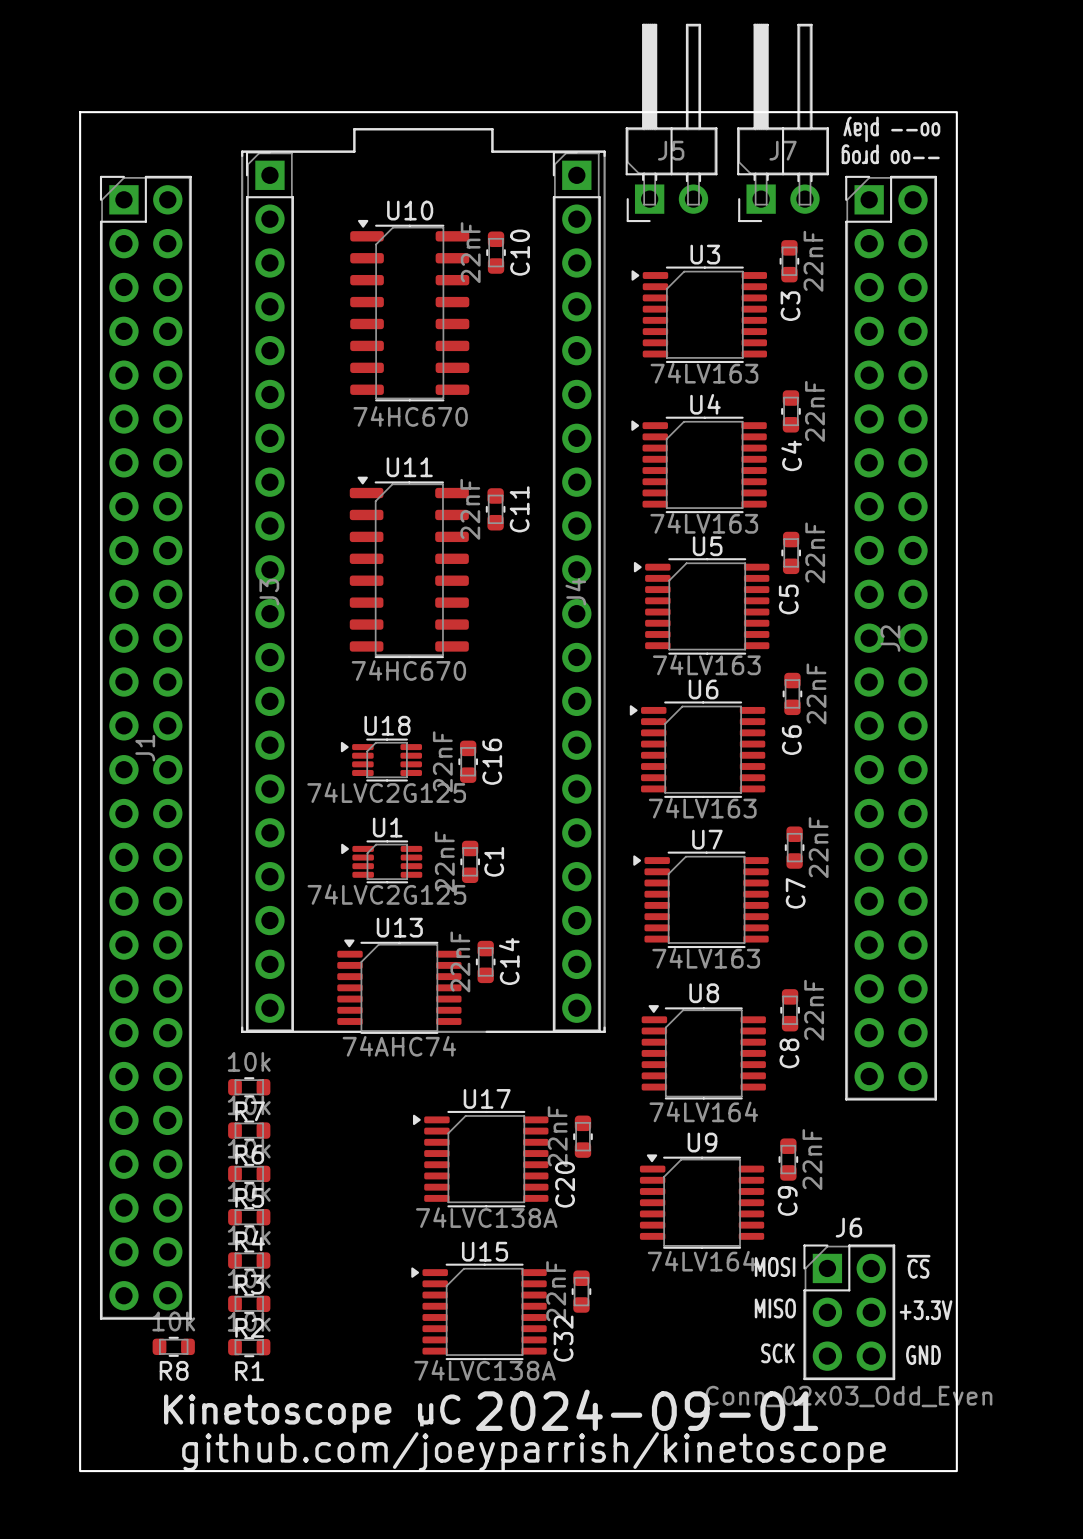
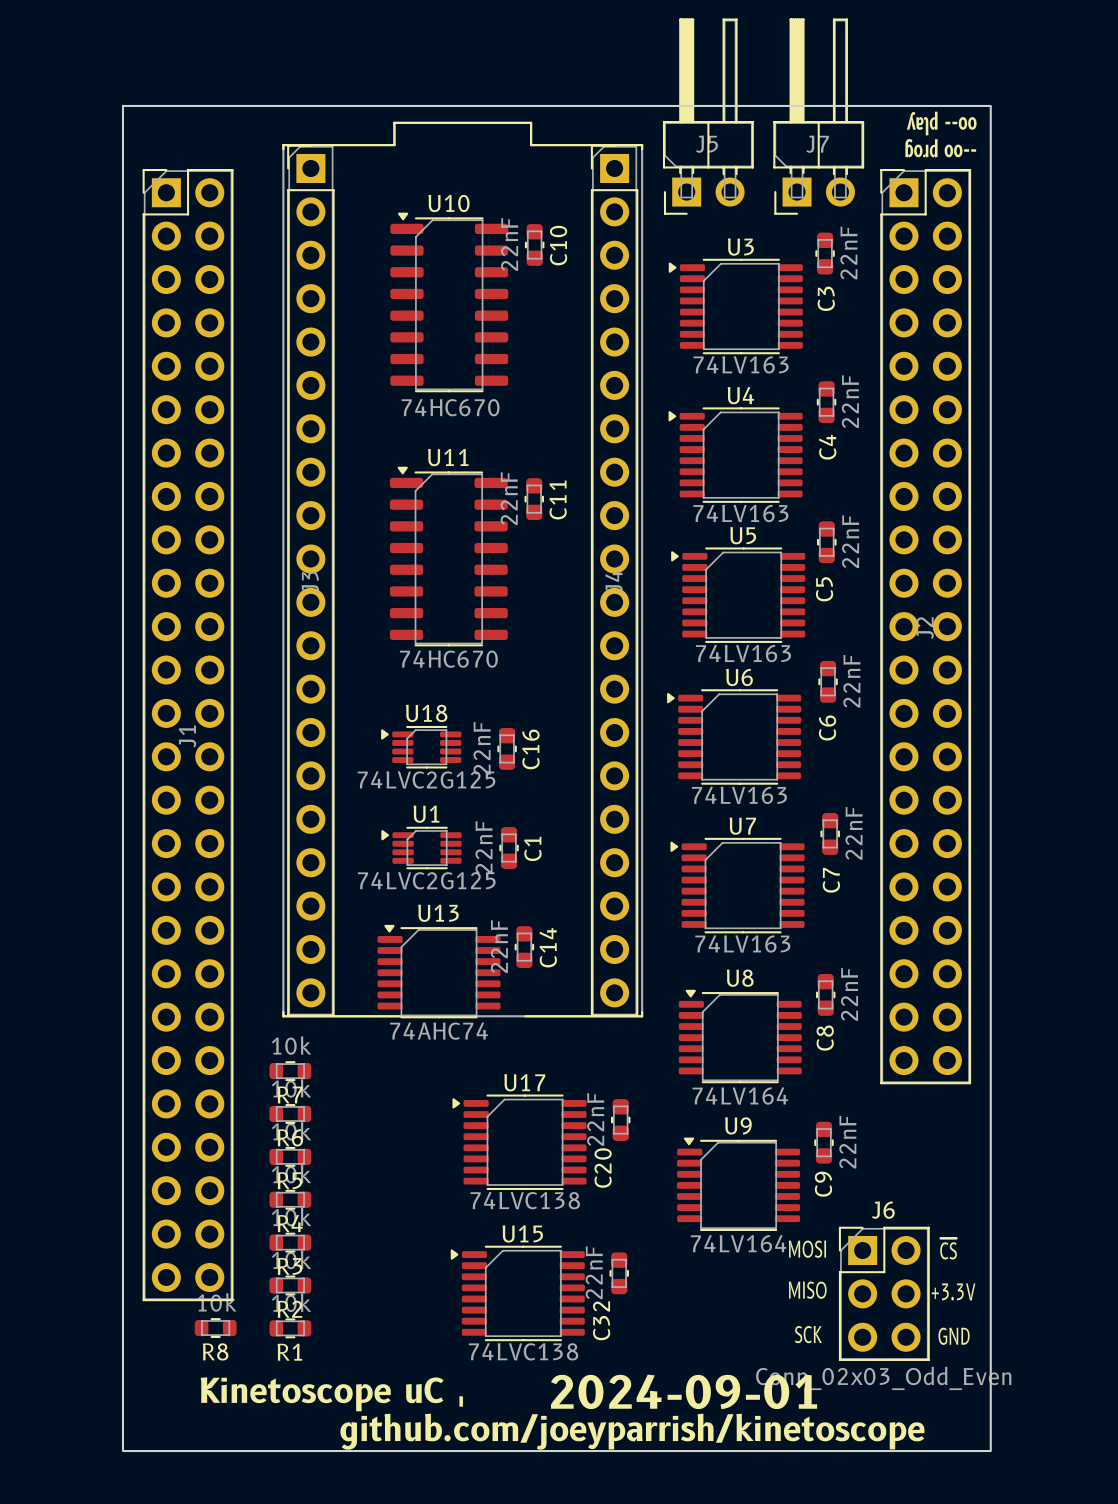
U17 value: 74LVC138A (486, 1217) -> 74LVC138 (525, 1200)
U15 value: 74LVC138A (485, 1370) -> 74LVC138 (523, 1351)

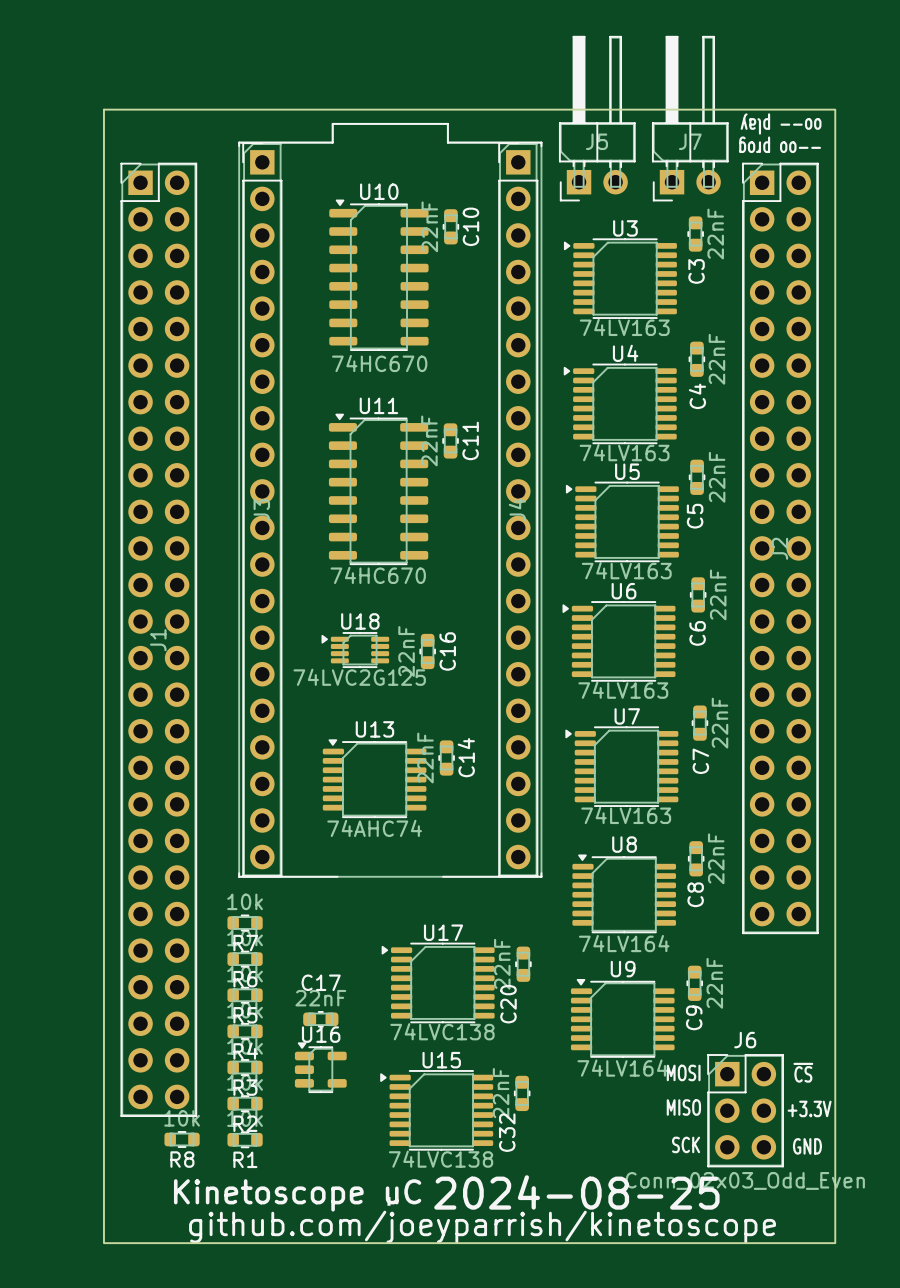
U1: 74LVC2G125 (421, 848) -> none
C1: 22nF (509, 848) -> none
C14 position: (524, 947) -> (446, 758)
U13 position: (439, 971) -> (374, 778)
C17: none -> 22nF (320, 1019)
U16: none -> (320, 1067)
text: 2024-09-01 (684, 1391) -> 2024-08-25 (576, 1192)

